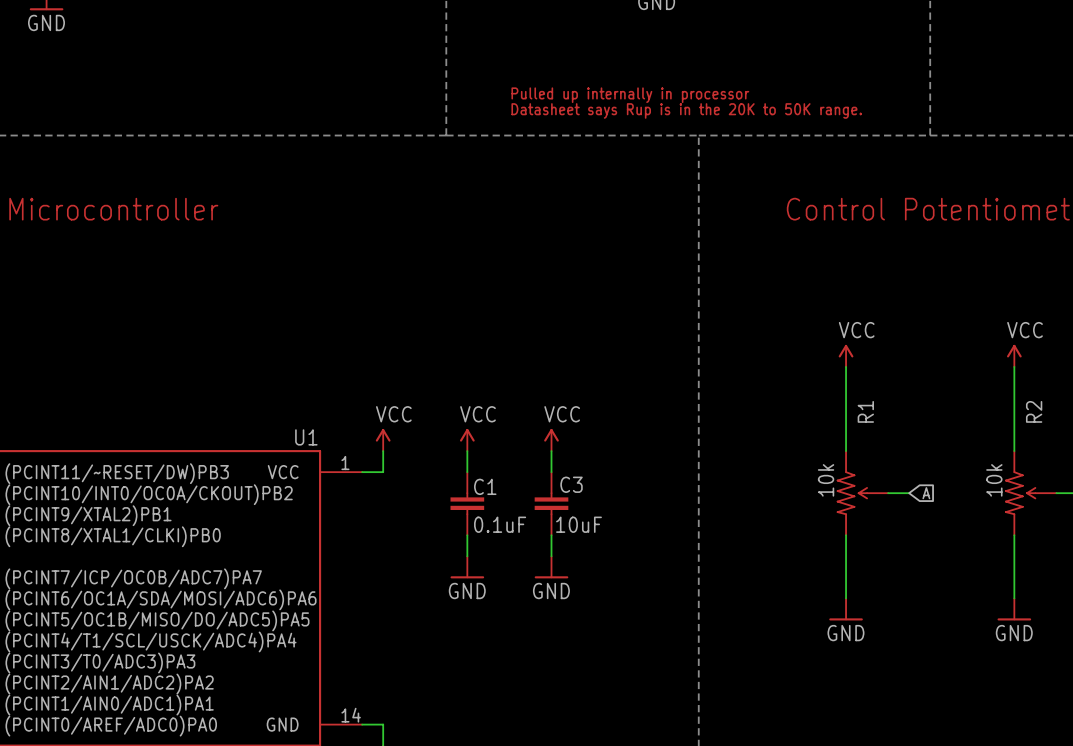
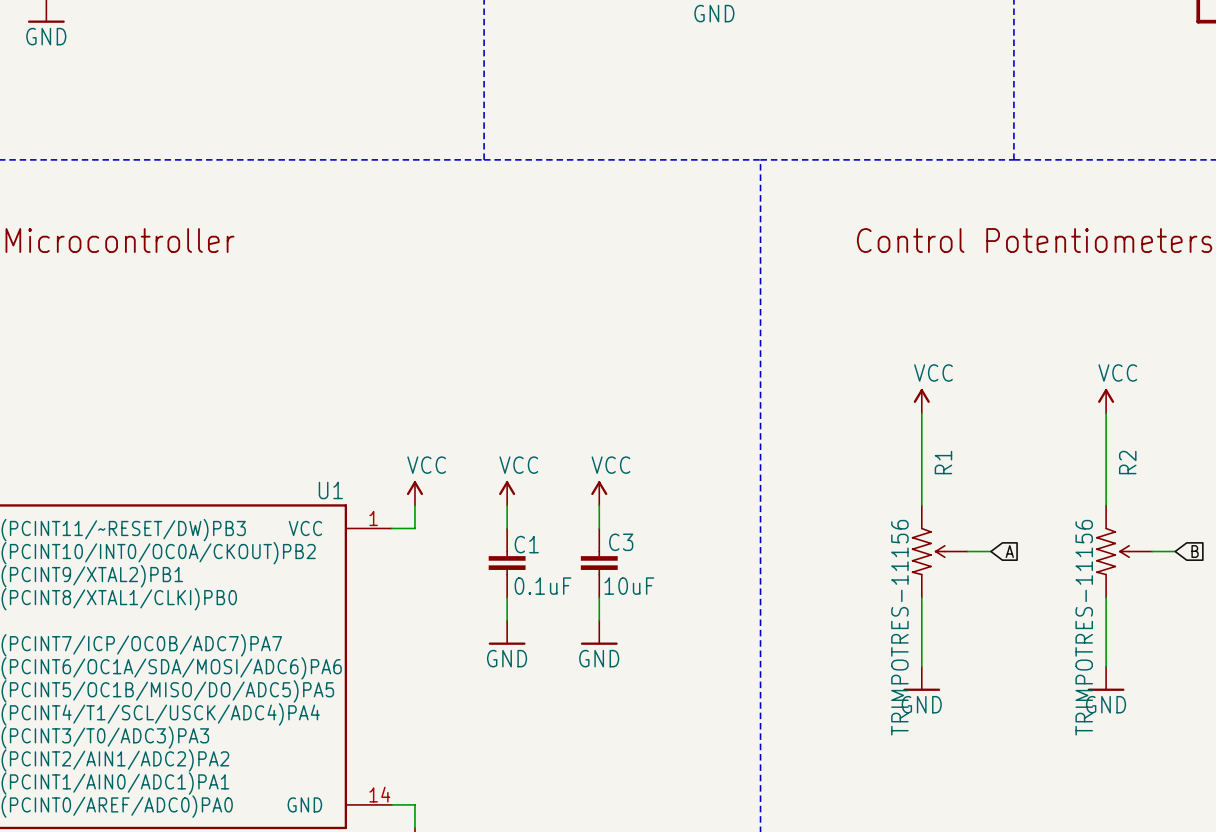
text: Pulled up internally in processor (630, 95) -> none
text: Datasheet says Rup is in the 20K to 50K range. (686, 110) -> none
R1 value: 10k (826, 480) -> TRIMPOTRES-11156 (899, 627)
R2 value: 10k (994, 480) -> TRIMPOTRES-11156 (1084, 627)

